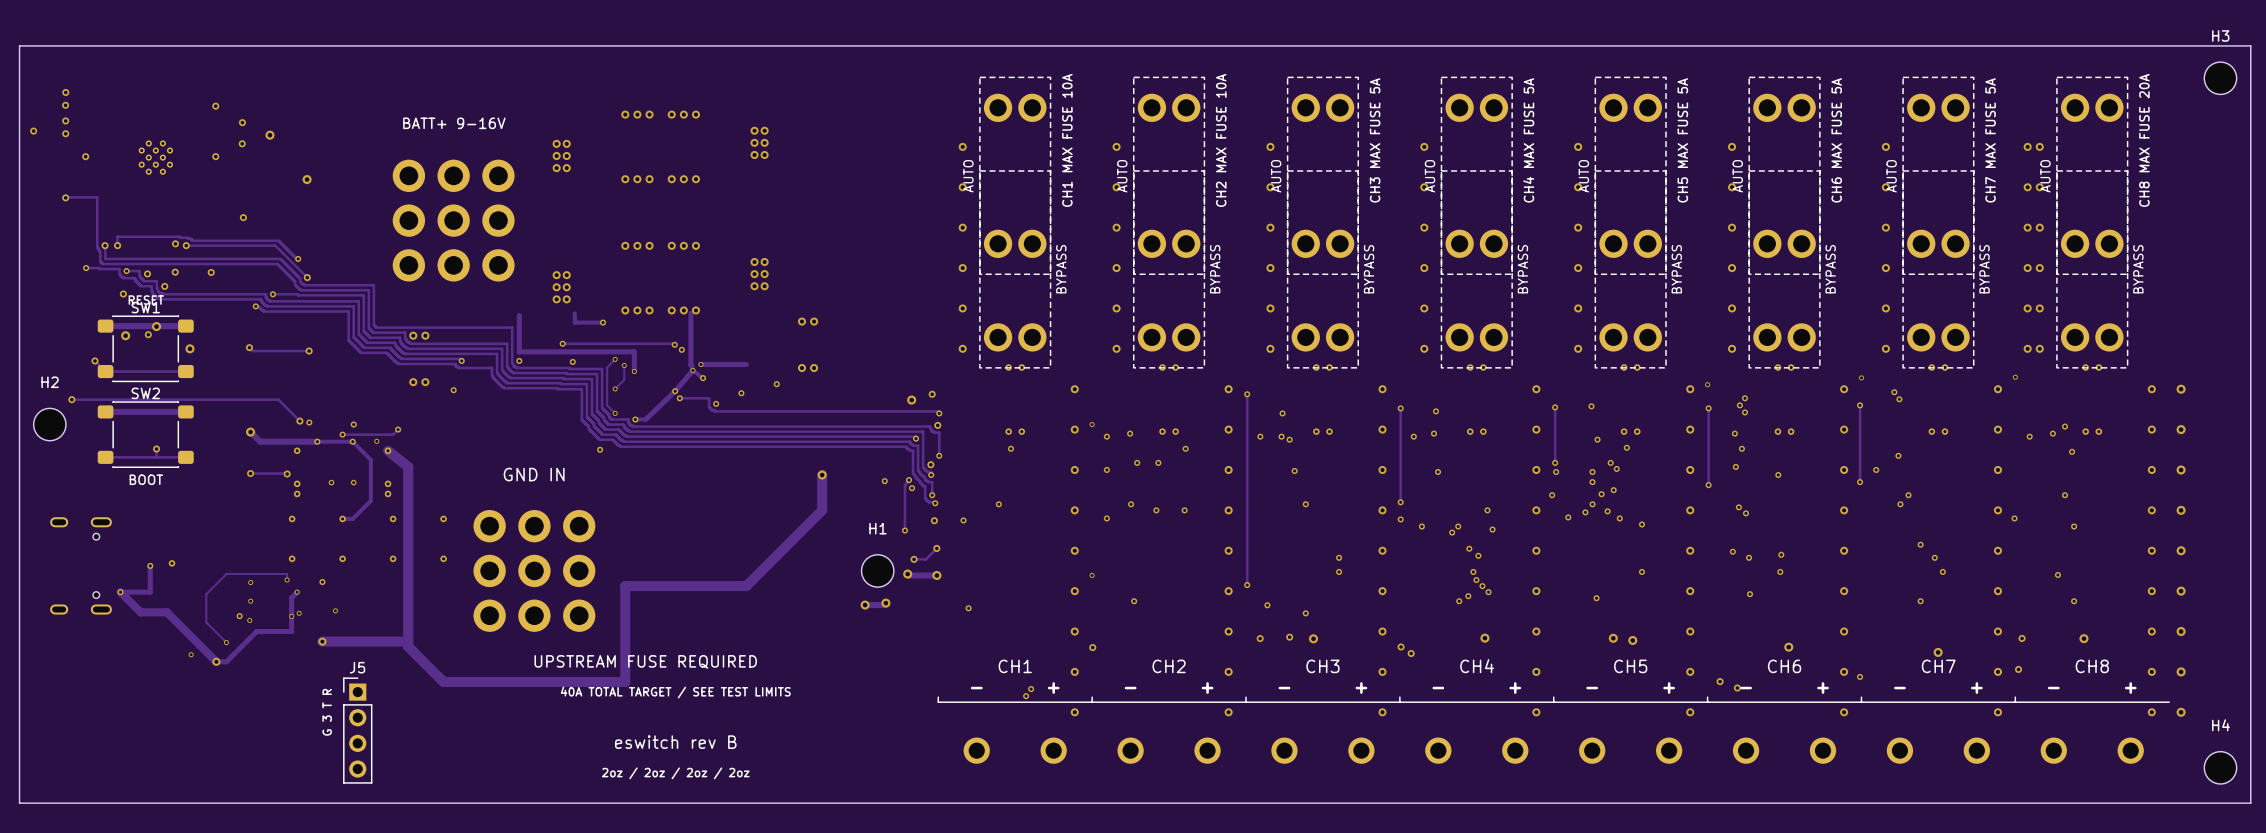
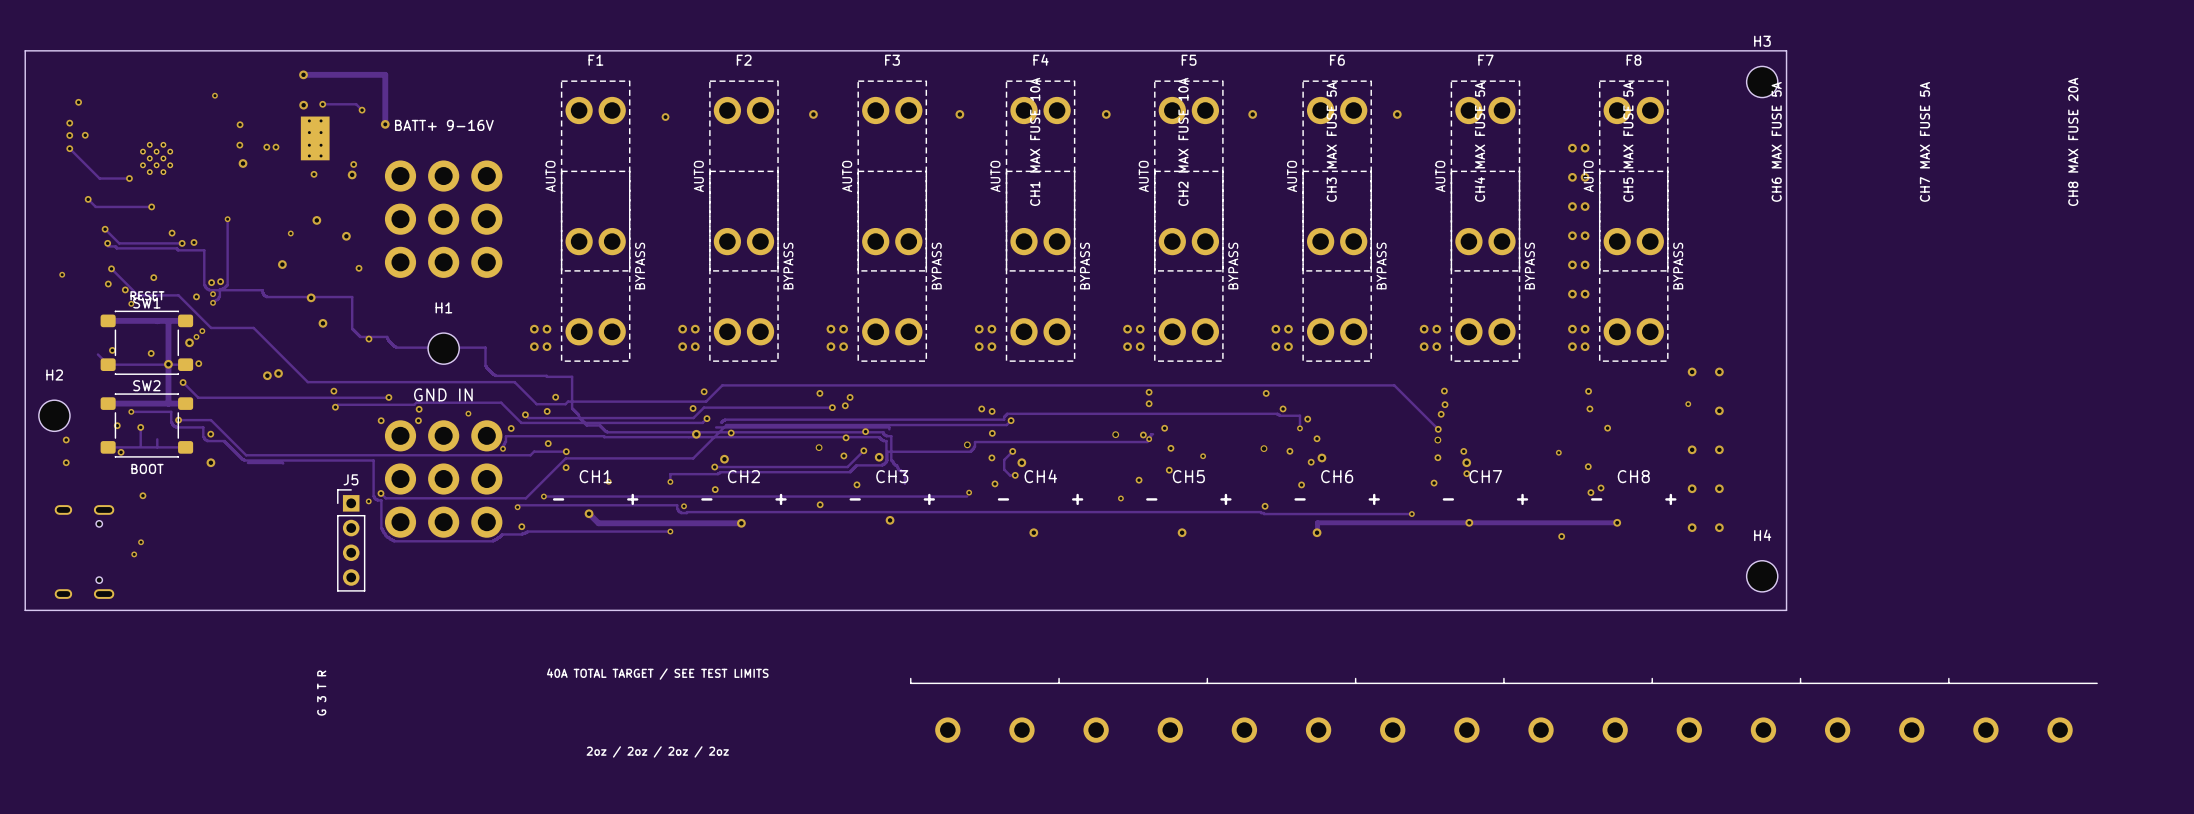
board edge: (1846, 45) (2250, 45) (2250, 803) (19, 803) (19, 626) -> (1786, 50) (1786, 610) (25, 610)
track: none -> (303, 74) (385, 74) (385, 124)
via: none -> (303, 74)
H3 position: (2220, 78) -> (1762, 81)
via: (65, 92) -> none
via: none -> (214, 95)
via: none -> (78, 102)
track: none -> (322, 104) (356, 104) (362, 110)
via: none -> (322, 104)
via: none -> (303, 105)
via: (65, 105) -> none
via: (215, 106) -> none
via: none -> (362, 110)
via: none -> (813, 114)
via: none -> (959, 114)
via: none -> (1106, 114)
via: none -> (1252, 114)
via: none -> (1397, 114)
via: (625, 114) -> none
via: (637, 114) -> none
via: (649, 114) -> none
via: (671, 114) -> none
via: (695, 114) -> none
via: none -> (385, 124)
via: (754, 130) -> none
via: (764, 130) -> none
via: (33, 131) -> none
via: none -> (85, 135)
via: (269, 135) -> none
part: none -> (315, 138)
via: (754, 142) -> none
via: (764, 142) -> none
via: (556, 143) -> none
via: (566, 143) -> none
via: none -> (266, 147)
via: none -> (275, 147)
via: (962, 146) -> none
via: (1116, 146) -> none
via: (1270, 146) -> none
via: (1424, 146) -> none
via: (1578, 146) -> none
via: none -> (1572, 148)
via: none -> (1585, 148)
via: (1732, 146) -> none
via: (1885, 146) -> none
via: (2027, 146) -> none
via: (2039, 146) -> none
track: none -> (69, 148) (99, 178) (129, 178)
via: none -> (69, 148)
via: (754, 154) -> none
via: (764, 154) -> none
via: (556, 155) -> none
via: (566, 155) -> none
via: (85, 156) -> none
via: (215, 156) -> none
via: none -> (243, 163)
via: none -> (353, 164)
via: (556, 168) -> none
via: (566, 168) -> none
via: none -> (314, 174)
via: none -> (352, 174)
via: none -> (1572, 177)
via: none -> (1585, 177)
via: none -> (129, 178)
via: (307, 179) -> none
via: (625, 179) -> none
via: (637, 179) -> none
via: (649, 179) -> none
via: (671, 179) -> none
via: (683, 179) -> none
via: (695, 179) -> none
via: (962, 187) -> none
via: (1116, 187) -> none
via: (1270, 187) -> none
via: (1424, 187) -> none
via: (1578, 187) -> none
via: (1732, 187) -> none
via: (1885, 187) -> none
via: (2027, 187) -> none
via: (2039, 187) -> none
track: (65, 197) (97, 197) (97, 247) (100, 251) (100, 262) (102, 264) (277, 264) (301, 290) (368, 290) (368, 328) (372, 332) (405, 332) (405, 338) (410, 343) (507, 343) (507, 367) (513, 373) (597, 374) (597, 411) (608, 424) (623, 424) (629, 431) (741, 431) -> none
via position: (65, 197) -> (88, 199)
track: none -> (88, 199) (95, 206) (151, 206)
via: none -> (151, 206)
via: none -> (1572, 206)
via: none -> (1585, 206)
via: (243, 217) -> none
track: none -> (227, 219) (227, 285) (219, 289) (219, 297) (213, 302)
via: none -> (227, 219)
via: none -> (316, 220)
F1: none -> (595, 221)
F2: none -> (743, 221)
F3: none -> (892, 221)
part: (1015, 222) -> none
F4: none -> (1040, 221)
part: (1169, 222) -> none
F5: none -> (1188, 221)
part: (1322, 222) -> none
F6: none -> (1337, 221)
part: (1476, 222) -> none
F7: none -> (1485, 221)
part: (1630, 222) -> none
F8: none -> (1633, 221)
part: (1784, 222) -> none
part: (1938, 222) -> none
part: (2092, 222) -> none
via: (962, 227) -> none
via: (1116, 227) -> none
via: (1270, 227) -> none
via: (1424, 227) -> none
via: (1578, 227) -> none
via: (1732, 227) -> none
via: (1885, 227) -> none
via: (2027, 227) -> none
via: (2039, 227) -> none
track: none -> (105, 229) (119, 243) (182, 243)
via: none -> (105, 229)
via: none -> (172, 233)
via: none -> (1572, 235)
via: none -> (1585, 235)
via: none -> (346, 236)
via: (175, 243) -> none
via: none -> (194, 242)
track: (105, 245) (105, 258) (281, 258) (300, 278) (300, 282) (304, 285) (373, 285) (373, 325) (375, 327) (512, 327) (512, 363) (514, 367) (602, 369) (602, 408) (609, 414) (611, 419) (628, 419) (629, 424) (632, 426) (930, 426) (930, 428) -> none
track: (117, 245) (117, 236) (180, 236) (188, 237) (192, 240) (279, 240) (298, 258) -> none
via: (117, 245) -> none
via: none -> (182, 243)
track: (186, 245) (275, 245) (307, 277) -> none
via: (186, 245) -> none
via: (625, 245) -> none
via: (637, 245) -> none
via: (649, 245) -> none
via: (671, 245) -> none
via: (683, 245) -> none
via: (695, 245) -> none
via position: (298, 258) -> (290, 233)
via: (754, 262) -> none
via: (764, 262) -> none
via: none -> (282, 264)
track: (86, 268) (119, 269) (121, 277) (134, 278) (140, 286) (151, 286) (152, 294) (159, 299) (260, 299) (266, 306) (353, 306) (353, 337) (363, 347) (391, 347) (401, 358) (461, 358) (461, 360) -> none
via: (86, 268) -> none
via: (962, 268) -> none
via: (1116, 268) -> none
via: (1270, 268) -> none
via: (1424, 268) -> none
via: (1578, 268) -> none
via: none -> (1572, 264)
via: none -> (1585, 264)
via: (1732, 268) -> none
via: (1885, 268) -> none
via: (2027, 268) -> none
via: (2039, 268) -> none
track: (126, 271) (139, 271) (139, 276) (143, 281) (156, 281) (157, 291) (162, 294) (210, 294) -> (107, 246) (115, 246) (116, 248) (204, 250) (204, 285) (209, 290)
via: (126, 271) -> none
via: none -> (359, 268)
track: none -> (111, 268) (138, 295) (178, 295) (211, 327) (253, 327) (307, 382) (514, 382) (536, 404) (565, 404) (568, 401) (706, 401) (722, 385) (1394, 385) (1438, 429)
via: none -> (111, 268)
via: (175, 272) -> none
via: (211, 272) -> none
via: (147, 273) -> none
via: (754, 274) -> none
via: (764, 274) -> none
via: (556, 275) -> none
via: (566, 275) -> none
via: (307, 277) -> none
via: none -> (62, 274)
via: none -> (153, 277)
via: none -> (220, 281)
via: (164, 286) -> none
via: none -> (211, 282)
via: (754, 286) -> none
via: (764, 286) -> none
via: none -> (108, 284)
via: (556, 287) -> none
via: (566, 287) -> none
track: (272, 294) (363, 295) (363, 331) (369, 337) (400, 337) (401, 343) (407, 348) (502, 348) (502, 370) (510, 378) (591, 379) (591, 414) (605, 429) (619, 429) (626, 436) (736, 436) -> none
via: (272, 294) -> none
via: none -> (213, 294)
via: none -> (1572, 294)
via: none -> (1585, 294)
via: (556, 299) -> none
via: (566, 299) -> none
via: none -> (196, 296)
via: none -> (311, 297)
track: (255, 306) (258, 306) (263, 311) (348, 311) (348, 340) (360, 352) (387, 352) (398, 363) (455, 363) (458, 368) (492, 368) (493, 378) (504, 388) (581, 389) (581, 420) (599, 439) (613, 439) (618, 445) -> (503, 448) (505, 436) (602, 436)
via: (255, 306) -> none
via: none -> (213, 302)
via: none -> (131, 303)
via: (962, 308) -> none
via: (1116, 308) -> none
via: (1270, 308) -> none
via: (1424, 308) -> none
via: (1578, 308) -> none
via: (1732, 308) -> none
via: (1885, 308) -> none
via: (2027, 308) -> none
via: (2039, 308) -> none
via: (625, 310) -> none
via: (637, 310) -> none
via: (649, 310) -> none
via: (671, 310) -> none
via: (683, 310) -> none
via: (695, 310) -> none
track: (574, 313) (574, 322) (603, 322) -> none
track: (690, 313) (690, 364) (692, 370) -> none
track: (519, 315) (519, 351) (634, 351) (634, 371) -> none
via: (801, 321) -> none
via: (814, 321) -> none
via: (603, 322) -> none
via: (156, 326) -> none
track: none -> (168, 320) (168, 403)
via: none -> (322, 323)
via: (148, 334) -> none
via: none -> (534, 329)
via: none -> (547, 329)
via: none -> (682, 329)
via: none -> (695, 329)
via: none -> (830, 329)
via: none -> (843, 329)
via: none -> (979, 329)
via: none -> (991, 329)
via: none -> (1127, 329)
via: none -> (1140, 329)
via: none -> (1275, 329)
via: none -> (1288, 329)
via: none -> (1424, 329)
via: none -> (1436, 329)
via: none -> (1572, 329)
via: none -> (1585, 329)
via: (125, 335) -> none
via: (413, 335) -> none
via: (425, 335) -> none
via: none -> (202, 331)
via: none -> (196, 336)
track: (562, 343) (674, 344) -> none
via: (562, 343) -> none
via: none -> (368, 339)
via: (674, 344) -> none
track: (249, 347) (252, 351) (309, 351) -> none
via: (249, 347) -> none
via: (962, 348) -> none
via: (1116, 348) -> none
via: (1270, 348) -> none
via: (1424, 348) -> none
via: (1578, 348) -> none
via: (1732, 348) -> none
via: (1885, 348) -> none
via: (2027, 348) -> none
via: (2039, 348) -> none
via: (681, 349) -> none
via: (309, 351) -> none
via: none -> (534, 346)
via: none -> (547, 346)
via: none -> (682, 346)
via: none -> (695, 346)
via: none -> (830, 346)
via: none -> (843, 346)
via: none -> (979, 346)
via: none -> (991, 346)
via: none -> (1127, 346)
via: none -> (1140, 346)
via: none -> (1275, 346)
via: none -> (1288, 346)
via: none -> (1424, 346)
via: none -> (1436, 346)
via: none -> (1572, 346)
via: none -> (1585, 346)
via: none -> (151, 353)
track: (615, 359) (607, 367) (607, 405) (615, 413) -> none
via: (615, 359) -> none
via position: (94, 360) -> (112, 350)
via: (461, 360) -> none
via: (519, 360) -> none
via: (572, 361) -> none
track: (701, 364) (746, 364) -> none
via: (701, 364) -> none
track: (624, 365) (624, 379) (615, 388) -> none
via: (624, 365) -> none
via: (1008, 367) -> none
via: (1021, 367) -> none
via: (1162, 367) -> none
via: (1175, 367) -> none
via: (1316, 367) -> none
via: (1329, 367) -> none
via: (1470, 367) -> none
via: (1483, 367) -> none
via: (1624, 367) -> none
via: (1637, 367) -> none
via: (1777, 367) -> none
via: (1791, 367) -> none
via: (1931, 367) -> none
via: (1944, 367) -> none
via: (2085, 367) -> none
via: (2098, 367) -> none
via: (801, 368) -> none
via: (814, 368) -> none
via: none -> (198, 363)
track: (692, 370) (675, 391) (645, 419) (635, 419) -> none
track: (692, 370) (703, 378) -> none
via: (692, 370) -> none
via: none -> (168, 364)
via: (634, 371) -> none
via: (1861, 377) -> none
via: (2015, 377) -> none
via: (703, 378) -> none
via: none -> (1692, 371)
via: none -> (1719, 371)
via: none -> (278, 373)
via: (413, 382) -> none
via: (425, 382) -> none
via: none -> (267, 375)
via: (776, 384) -> none
via: (1707, 384) -> none
via: (615, 388) -> none
via: (1074, 389) -> none
via: (1228, 389) -> none
via: (1382, 389) -> none
via: (1536, 389) -> none
via: (1690, 389) -> none
via: (1844, 389) -> none
via: (1997, 389) -> none
via: (2151, 389) -> none
via: (2181, 389) -> none
track: none -> (183, 382) (198, 397) (388, 397)
via: none -> (183, 382)
via: (453, 390) -> none
via: (675, 391) -> none
via: (1894, 392) -> none
via: (741, 393) -> none
via: (932, 394) -> none
track: (1247, 394) (1247, 585) -> none
via: (1247, 394) -> none
track: (679, 398) (709, 398) (709, 407) (715, 411) (939, 411) (939, 413) -> none
via: (679, 398) -> none
via: none -> (1444, 391)
via: (1744, 398) -> none
track: (71, 399) (278, 399) (299, 421) -> none
via: (71, 399) -> none
via: none -> (333, 391)
via: none -> (704, 391)
via: none -> (1588, 391)
via: (1899, 399) -> none
via: (911, 400) -> none
via: none -> (1149, 392)
via: none -> (819, 393)
via: none -> (1266, 393)
via: (716, 403) -> none
via: none -> (388, 397)
via: none -> (555, 397)
via: none -> (850, 397)
via: (1739, 405) -> none
track: (1860, 405) (1860, 482) -> none
via: (1860, 405) -> none
via: (1591, 406) -> none
track: (1555, 407) (1555, 462) -> none
via: (1555, 407) -> none
track: (1400, 408) (1400, 502) -> none
via: (1400, 408) -> none
track: (1708, 408) (1708, 485) -> none
via: (1708, 408) -> none
via: (1436, 411) -> none
via: none -> (1149, 403)
via: (615, 413) -> none
via: (939, 413) -> none
via: (1282, 413) -> none
via: none -> (1445, 404)
via: none -> (845, 405)
track: none -> (335, 407) (337, 404) (501, 402) (521, 422) (702, 422) (706, 418)
via: none -> (335, 407)
via: none -> (693, 408)
track: none -> (832, 407) (703, 407) (693, 418) (528, 418) (525, 414)
via: none -> (832, 407)
via: none -> (419, 409)
via: none -> (981, 408)
via: none -> (1283, 408)
via: none -> (1589, 408)
via: (635, 419) -> none
via: none -> (1719, 410)
track: none -> (131, 411) (171, 411) (171, 422) (174, 426) (203, 427) (205, 440) (224, 441) (244, 460) (373, 460) (373, 496) (375, 499) (381, 500) (381, 528) (385, 535) (394, 541) (493, 541) (502, 534) (522, 534) (527, 531) (670, 531)
via: none -> (131, 411)
via: none -> (547, 411)
via: none -> (992, 411)
via: (299, 421) -> none
via: (309, 422) -> none
via: none -> (468, 413)
via: none -> (525, 414)
via: none -> (1441, 414)
via: (353, 424) -> none
via: (1092, 424) -> none
via: (937, 425) -> none
via: (2065, 426) -> none
via: none -> (706, 418)
track: (931, 428) (932, 431) (939, 432) (939, 455) -> (903, 419) (1004, 419) (1007, 413) (1277, 413) (1279, 415) (1299, 415) (1299, 428)
via: none -> (1307, 419)
track: none -> (178, 420) (210, 420) (246, 455) (530, 455) (534, 451) (566, 451)
via: none -> (178, 420)
via: none -> (381, 420)
track: (398, 429) (393, 434) (342, 434) -> none
via: (398, 429) -> none
via: none -> (418, 420)
track: none -> (1011, 420) (1006, 425) (726, 425) (693, 458) (565, 458) (525, 498) (385, 498) (380, 493)
via: none -> (1011, 420)
via: (1074, 429) -> none
via: (1228, 429) -> none
via: (1382, 429) -> none
via: (1536, 429) -> none
via: (1690, 429) -> none
via: (1844, 429) -> none
via: (1997, 429) -> none
via: (2151, 429) -> none
via: (2181, 429) -> none
track: (742, 431) (923, 431) (923, 467) (925, 470) (931, 472) (931, 475) -> (721, 422) (724, 419) (902, 419)
via: (1008, 431) -> none
via: (1021, 431) -> none
via: (1162, 431) -> none
via: (1175, 431) -> none
via: (1316, 431) -> none
via: (1329, 431) -> none
via: (1470, 431) -> none
via: (1483, 431) -> none
via: (1624, 431) -> none
via: (1637, 431) -> none
via: (1777, 431) -> none
via: (1791, 431) -> none
via: (1931, 431) -> none
via: (1944, 431) -> none
via: (2085, 431) -> none
via: (2098, 431) -> none
track: (250, 432) (260, 441) (352, 441) (370, 459) (370, 500) (352, 518) (342, 518) -> none
via: (250, 432) -> none
via: (1130, 433) -> none
via: (1434, 433) -> none
via: (1734, 433) -> none
via: (2052, 433) -> none
via: none -> (117, 425)
via: (342, 434) -> none
track: none -> (140, 427) (140, 445)
via: none -> (140, 427)
via: (1106, 436) -> none
via: (1260, 436) -> none
via: (1281, 436) -> none
via: (1413, 436) -> none
via: (2029, 436) -> none
via: none -> (511, 428)
via: none -> (1164, 428)
via: none -> (1299, 428)
via: none -> (1607, 428)
via: (916, 438) -> none
via: none -> (1438, 429)
via: (1289, 439) -> none
via: (1597, 439) -> none
via: (317, 441) -> none
via: (352, 441) -> none
via: (376, 441) -> none
via: none -> (865, 431)
via: none -> (731, 433)
via: none -> (992, 433)
via: none -> (210, 434)
via: none -> (696, 434)
track: none -> (1153, 434) (1151, 434) (1147, 442) (974, 442) (974, 446) (971, 451) (887, 451) (886, 460)
via: none -> (1115, 434)
via: none -> (1143, 434)
via: none -> (846, 437)
via: (1626, 447) -> none
via: (1010, 448) -> none
via: none -> (1317, 438)
via: (1741, 448) -> none
via: none -> (66, 439)
via: (156, 449) -> none
via: (600, 449) -> none
via: none -> (1437, 440)
via: (297, 450) -> none
track: (388, 450) (408, 466) (408, 646) (443, 682) (625, 682) (625, 586) (746, 586) (822, 510) (822, 475) -> none
via: (388, 450) -> none
via: (2072, 451) -> none
via: none -> (548, 443)
via: none -> (967, 444)
via: (939, 455) -> none
via: (1898, 455) -> none
via: none -> (819, 447)
via: none -> (503, 448)
via: none -> (1170, 448)
via: none -> (1263, 448)
via: none -> (1692, 449)
via: none -> (1719, 449)
track: none -> (863, 450) (847, 467) (714, 467)
via: none -> (863, 450)
via: none -> (566, 451)
track: none -> (1012, 451) (1004, 459) (1004, 469) (1009, 475) (1015, 475)
via: none -> (1012, 451)
via: none -> (1289, 451)
via: none -> (1463, 451)
via: none -> (121, 452)
via: (1137, 462) -> none
via: (1158, 462) -> none
via: (1555, 462) -> none
via: (930, 464) -> none
via: none -> (843, 455)
via: none -> (1203, 456)
via: (1735, 466) -> none
via: none -> (879, 457)
via: none -> (991, 457)
via: none -> (1321, 457)
via: none -> (1437, 457)
via: (1616, 468) -> none
via: none -> (724, 459)
via: (1074, 469) -> none
via: (1106, 469) -> none
via: (1228, 469) -> none
via: (1382, 469) -> none
via: (1536, 469) -> none
via: (1690, 469) -> none
via: (1844, 469) -> none
via: (1876, 469) -> none
via: (1997, 469) -> none
via: (2151, 469) -> none
via: (2181, 469) -> none
via: (1294, 470) -> none
via: none -> (1311, 462)
via: (1438, 472) -> none
via: (1556, 472) -> none
via: (1592, 472) -> none
via: none -> (66, 462)
via: none -> (210, 462)
via: (250, 473) -> none
track: (913, 473) (920, 483) (925, 486) (926, 500) (935, 503) -> (886, 462) (882, 465) (856, 465) (850, 472) (670, 474) (670, 481)
via: none -> (1021, 462)
via: none -> (1466, 462)
via: (287, 474) -> none
text position: GND IN (534, 474) -> GND IN (443, 394)
via: (822, 475) -> none
via: (931, 475) -> none
via: (1778, 475) -> none
via: none -> (714, 467)
via: none -> (1588, 466)
via: none -> (566, 467)
track: (909, 480) (904, 485) (904, 530) -> none
via: (909, 480) -> none
via: (884, 481) -> none
via: none -> (1169, 470)
via: (331, 482) -> none
via: (353, 482) -> none
via: (1592, 482) -> none
via: (1860, 482) -> none
via: (297, 483) -> none
via: (388, 483) -> none
via: none -> (1466, 473)
via: (1708, 485) -> none
via: none -> (1015, 475)
text: none -> CH1 (595, 476)
text: none -> CH2 (743, 476)
text: none -> CH3 (892, 476)
text: none -> CH4 (1040, 476)
text: none -> CH5 (1188, 476)
text: none -> CH6 (1337, 476)
text: none -> CH7 (1485, 476)
text: none -> CH8 (1633, 476)
via: (912, 488) -> none
via: (1613, 490) -> none
via: none -> (1139, 480)
via: (297, 493) -> none
via: (388, 493) -> none
via: none -> (608, 481)
via: none -> (670, 481)
via: none -> (1434, 483)
via: (1601, 494) -> none
via: (932, 495) -> none
via: none -> (994, 483)
via: (1552, 495) -> none
via: (1908, 495) -> none
via: (2065, 495) -> none
via: none -> (856, 484)
via: none -> (1301, 484)
via: none -> (1601, 488)
via: none -> (1692, 488)
via: none -> (1719, 488)
via: none -> (715, 489)
via: (1400, 502) -> none
via: (935, 503) -> none
via: (1131, 504) -> none
via: (1305, 504) -> none
via: (1592, 504) -> none
via: none -> (1590, 492)
via: (1900, 504) -> none
via: none -> (380, 493)
via: none -> (142, 495)
via: (1738, 507) -> none
track: none -> (543, 496) (967, 496)
via: none -> (543, 496)
via: (1074, 510) -> none
via: (1184, 510) -> none
via: (1228, 510) -> none
via: (1382, 510) -> none
via: (1487, 510) -> none
via: (1536, 510) -> none
via: (1690, 510) -> none
via: (1844, 510) -> none
via: (1997, 510) -> none
via: (2151, 510) -> none
via: (2181, 510) -> none
text: none -> - (558, 499)
text: none -> + (632, 499)
text: none -> - (706, 499)
text: none -> + (781, 499)
text: none -> - (855, 499)
text: none -> + (929, 499)
text: none -> - (1003, 499)
text: none -> + (1077, 499)
text: none -> - (1151, 499)
text: none -> + (1225, 499)
text: none -> - (1300, 499)
text: none -> + (1374, 499)
text: none -> - (1448, 499)
text: none -> + (1522, 499)
via: (1607, 511) -> none
text: none -> - (1596, 499)
text: none -> + (1670, 499)
via: (1585, 512) -> none
via: none -> (368, 501)
via: (1745, 513) -> none
via: none -> (820, 504)
via: (1568, 517) -> none
via: (292, 518) -> none
via: (342, 518) -> none
via: (393, 518) -> none
via: (443, 518) -> none
via: none -> (684, 506)
via: (1106, 518) -> none
via: none -> (1265, 506)
via: (1619, 518) -> none
via: (2014, 518) -> none
track: none -> (517, 507) (517, 505) (677, 505) (678, 511) (681, 513) (1261, 512) (1263, 514) (1411, 514)
via: none -> (517, 507)
via: (1400, 519) -> none
via: (934, 520) -> none
via: (963, 520) -> none
via: (1641, 524) -> none
track: none -> (589, 513) (598, 523) (741, 523)
via: none -> (589, 513)
via: (1421, 526) -> none
via: (2074, 526) -> none
via: (1492, 529) -> none
via: (904, 530) -> none
via: (1452, 532) -> none
via: none -> (890, 520)
via: none -> (1469, 522)
track: none -> (1617, 522) (1317, 522) (1317, 532)
via: none -> (1617, 522)
via: none -> (741, 523)
via: none -> (521, 526)
via: none -> (1692, 527)
via: none -> (1719, 527)
via: none -> (670, 531)
via: (1920, 544) -> none
via: none -> (1033, 532)
via: none -> (1182, 532)
via: none -> (1317, 532)
track: (936, 548) (925, 559) (914, 559) -> none
via: (936, 548) -> none
via: (1469, 548) -> none
via: none -> (1561, 536)
via: (1074, 550) -> none
via: (1228, 550) -> none
via: (1382, 550) -> none
via: (1536, 550) -> none
via: (1690, 550) -> none
via: (1844, 550) -> none
via: (1997, 550) -> none
via: (2151, 550) -> none
via: (2181, 550) -> none
via: (1732, 551) -> none
via: (1781, 554) -> none
via: none -> (141, 542)
via: (1478, 555) -> none
via: (1339, 557) -> none
via: (1748, 557) -> none
via: (1934, 557) -> none
via: (292, 558) -> none
via: (342, 558) -> none
via: (393, 558) -> none
via: (443, 558) -> none
via: (914, 559) -> none
via: (171, 563) -> none
track: (150, 565) (150, 592) (120, 592) (140, 612) (166, 612) (216, 661) (226, 661) (256, 631) (291, 631) (291, 597) (297, 592) -> none
via: (150, 565) -> none
via: none -> (134, 554)
part position: (534, 570) -> (443, 479)
H1 position: (877, 570) -> (443, 348)
via: (1339, 571) -> none
via: (1473, 571) -> none
via: (1641, 571) -> none
via: (1780, 571) -> none
via: (1942, 571) -> none
track: (907, 574) (936, 575) -> none
via: (907, 574) -> none
via: (2057, 574) -> none
via: (936, 575) -> none
via: (1092, 575) -> none
track: (287, 580) (287, 573) (226, 573) (206, 594) (206, 622) (226, 642) -> none
via: (287, 580) -> none
via: (1476, 580) -> none
via: (250, 582) -> none
via: (322, 582) -> none
via: (1247, 585) -> none
via: (1482, 586) -> none
via: (1074, 591) -> none
via: (1228, 591) -> none
via: (1382, 591) -> none
via: (1536, 591) -> none
via: (1690, 591) -> none
via: (1844, 591) -> none
via: (1997, 591) -> none
via: (2151, 591) -> none
via: (2181, 591) -> none
via: (120, 592) -> none
via: (297, 592) -> none
via: (1488, 592) -> none
via: (1750, 594) -> none
via: (1468, 596) -> none
via: (1596, 598) -> none
via: (250, 601) -> none
via: (1134, 601) -> none
via: (1459, 601) -> none
via: (1920, 601) -> none
via: (2074, 601) -> none
track: (885, 603) (883, 605) (865, 605) -> none
via: (885, 603) -> none
via: (865, 605) -> none
via: (1267, 605) -> none
via: (968, 608) -> none
via: (335, 610) -> none
via: (299, 613) -> none
via: (1305, 613) -> none
via: (239, 616) -> none
via: (291, 616) -> none
via: (249, 620) -> none
via: (1074, 631) -> none
via: (1228, 631) -> none
via: (1382, 631) -> none
via: (1536, 631) -> none
via: (1690, 631) -> none
via: (1844, 631) -> none
via: (1997, 631) -> none
via: (2151, 631) -> none
via: (2181, 631) -> none
via: (1289, 637) -> none
via: (1260, 638) -> none
via: (1313, 638) -> none
via: (1484, 638) -> none
via: (1613, 638) -> none
via: (2022, 638) -> none
via: (2083, 638) -> none
via: (1632, 640) -> none
track: (322, 641) (408, 641) -> none
via: (322, 641) -> none
via: (226, 642) -> none
via: (1401, 646) -> none
via: (1092, 647) -> none
via: (1788, 647) -> none
via: (1938, 652) -> none
via: (1411, 653) -> none
via: (191, 654) -> none
via: (216, 661) -> none
text: UPSTREAM FUSE REQUIRED (645, 661) -> none
text: CH1 (1015, 666) -> none
text: CH2 (1169, 666) -> none
text: CH3 (1322, 666) -> none
text: CH4 (1477, 666) -> none
text: CH5 (1630, 666) -> none
text: CH6 (1784, 666) -> none
text: CH7 (1938, 666) -> none
text: CH8 (2092, 666) -> none
via: (2018, 669) -> none
via: (1074, 671) -> none
via: (1228, 671) -> none
via: (1382, 671) -> none
via: (1536, 671) -> none
via: (1690, 671) -> none
via: (1844, 671) -> none
via: (1997, 671) -> none
via: (2151, 671) -> none
via: (2181, 671) -> none
via: (1860, 676) -> none
via: (1720, 681) -> none
text: - (976, 688) -> none
text: + (1053, 688) -> none
text: - (1130, 688) -> none
text: + (1207, 688) -> none
text: - (1284, 688) -> none
text: + (1361, 688) -> none
text: - (1438, 688) -> none
text: + (1515, 688) -> none
text: - (1592, 688) -> none
text: + (1669, 688) -> none
via: (1737, 688) -> none
text: - (1746, 688) -> none
text: + (1823, 688) -> none
text: - (1899, 688) -> none
text: + (1976, 688) -> none
text: - (2053, 688) -> none
text: + (2130, 688) -> none
via: (1031, 689) -> none
via: (1026, 696) -> none
via: (1074, 712) -> none
via: (1228, 712) -> none
via: (1382, 712) -> none
via: (1536, 712) -> none
via: (1690, 712) -> none
via: (1844, 712) -> none
via: (1997, 712) -> none
via: (2151, 712) -> none
via: (2181, 712) -> none
J5 position: (357, 730) -> (351, 540)
text: eswitch rev B (675, 742) -> none
H4 position: (2220, 767) -> (1762, 576)

